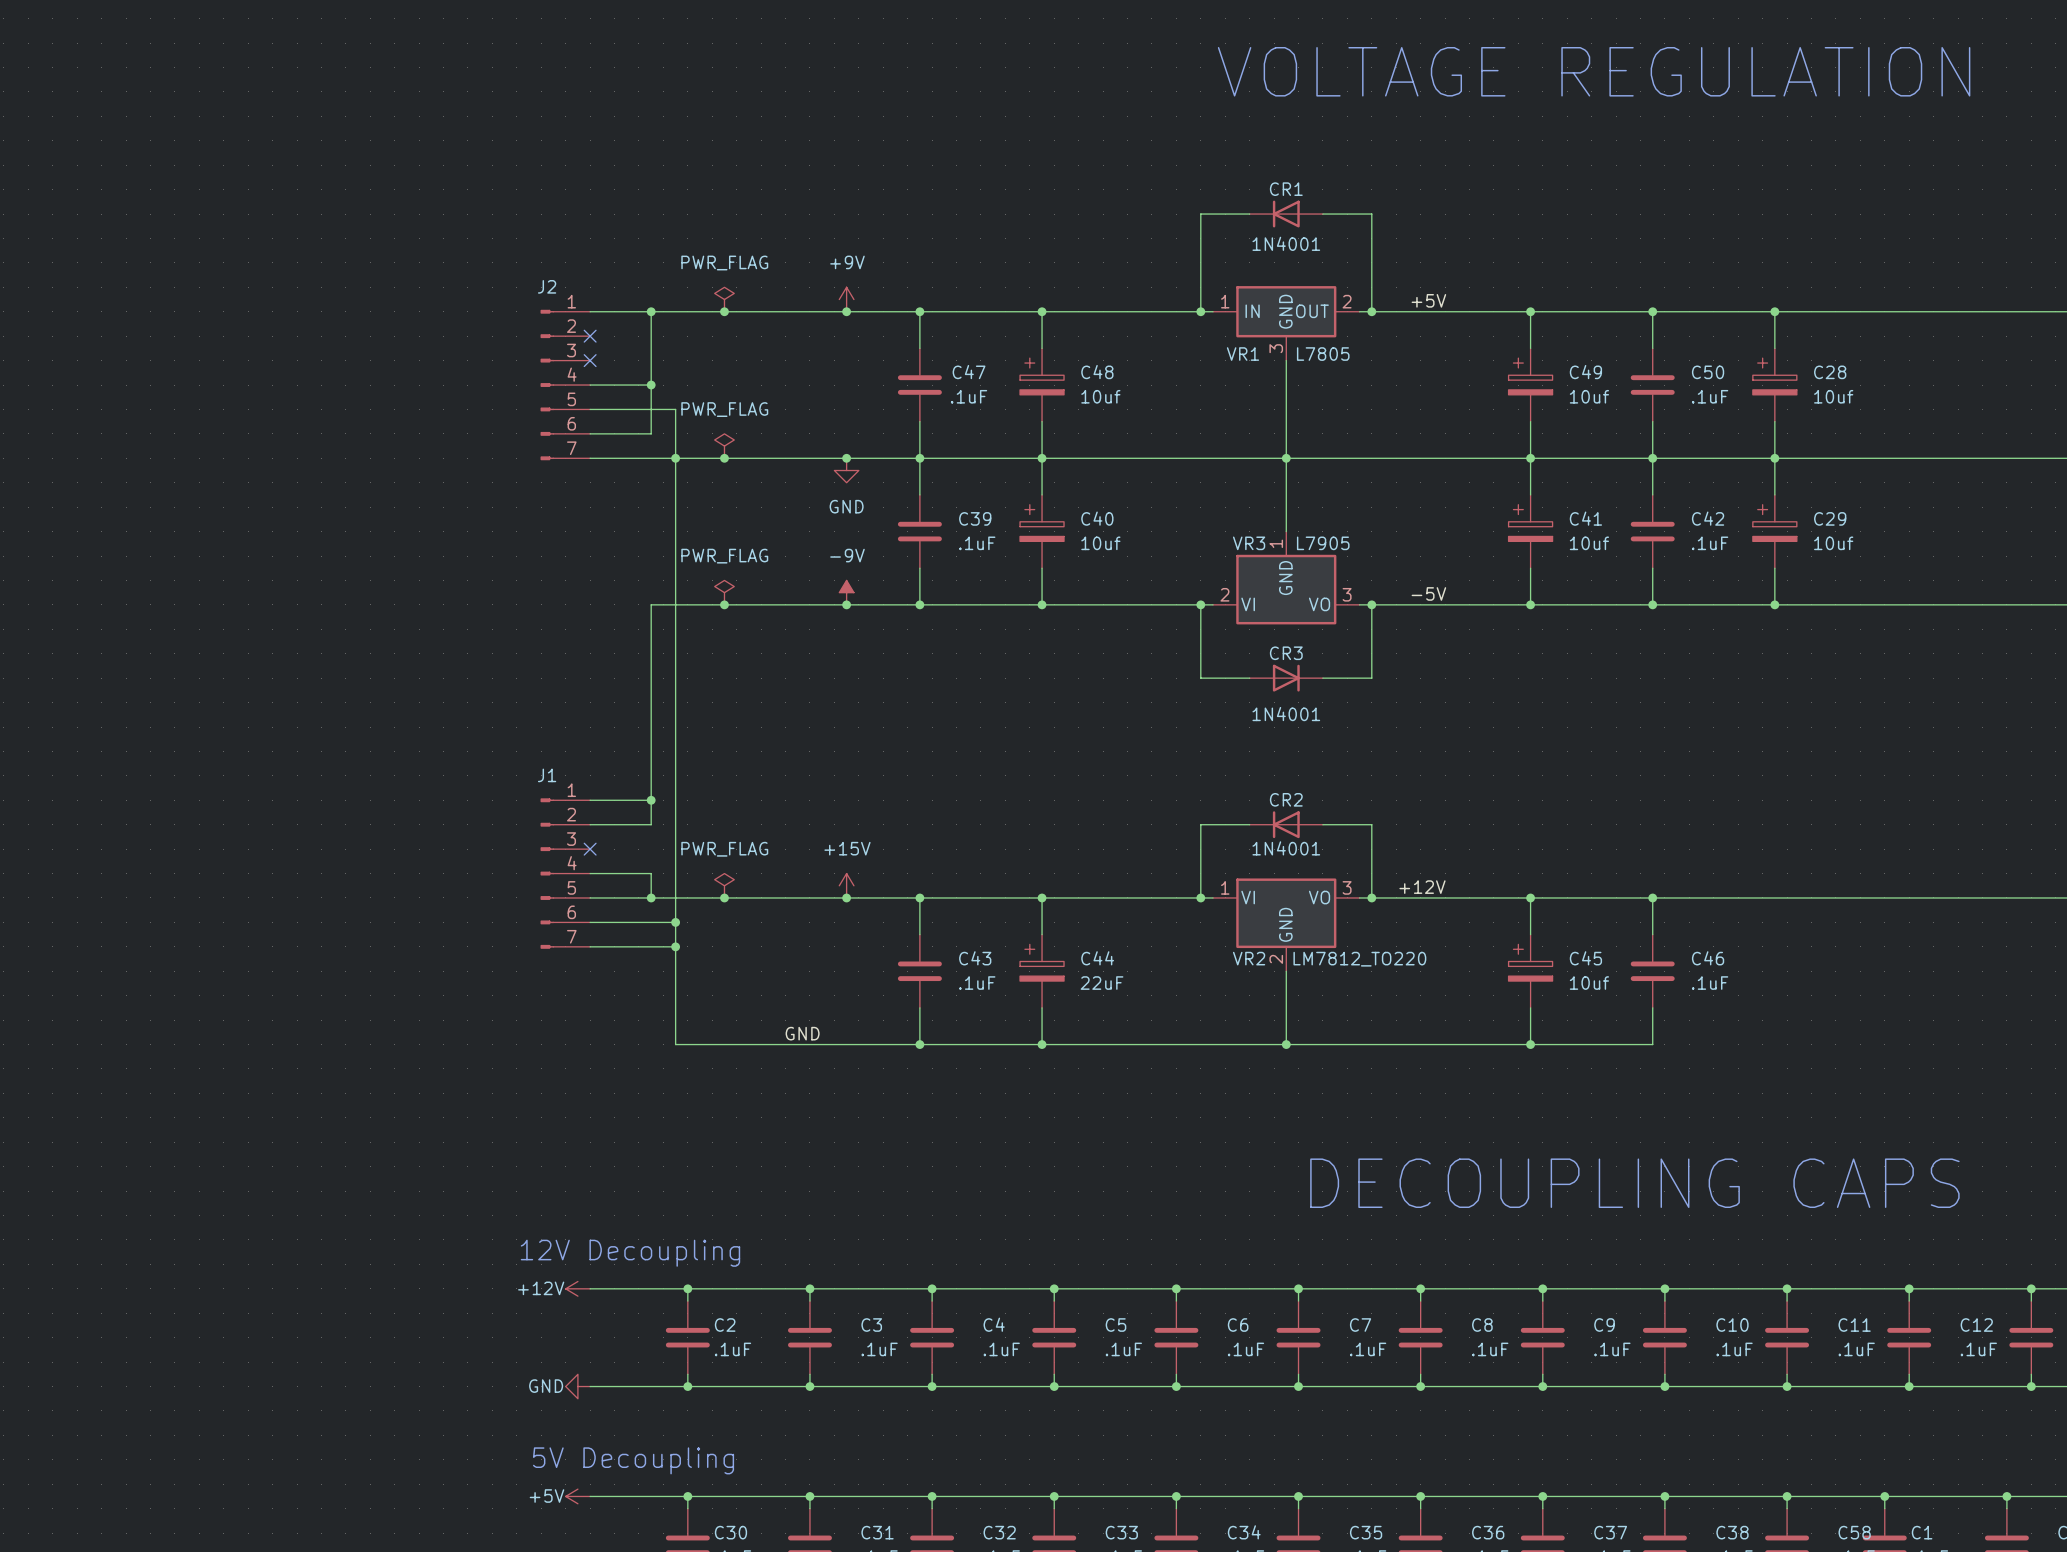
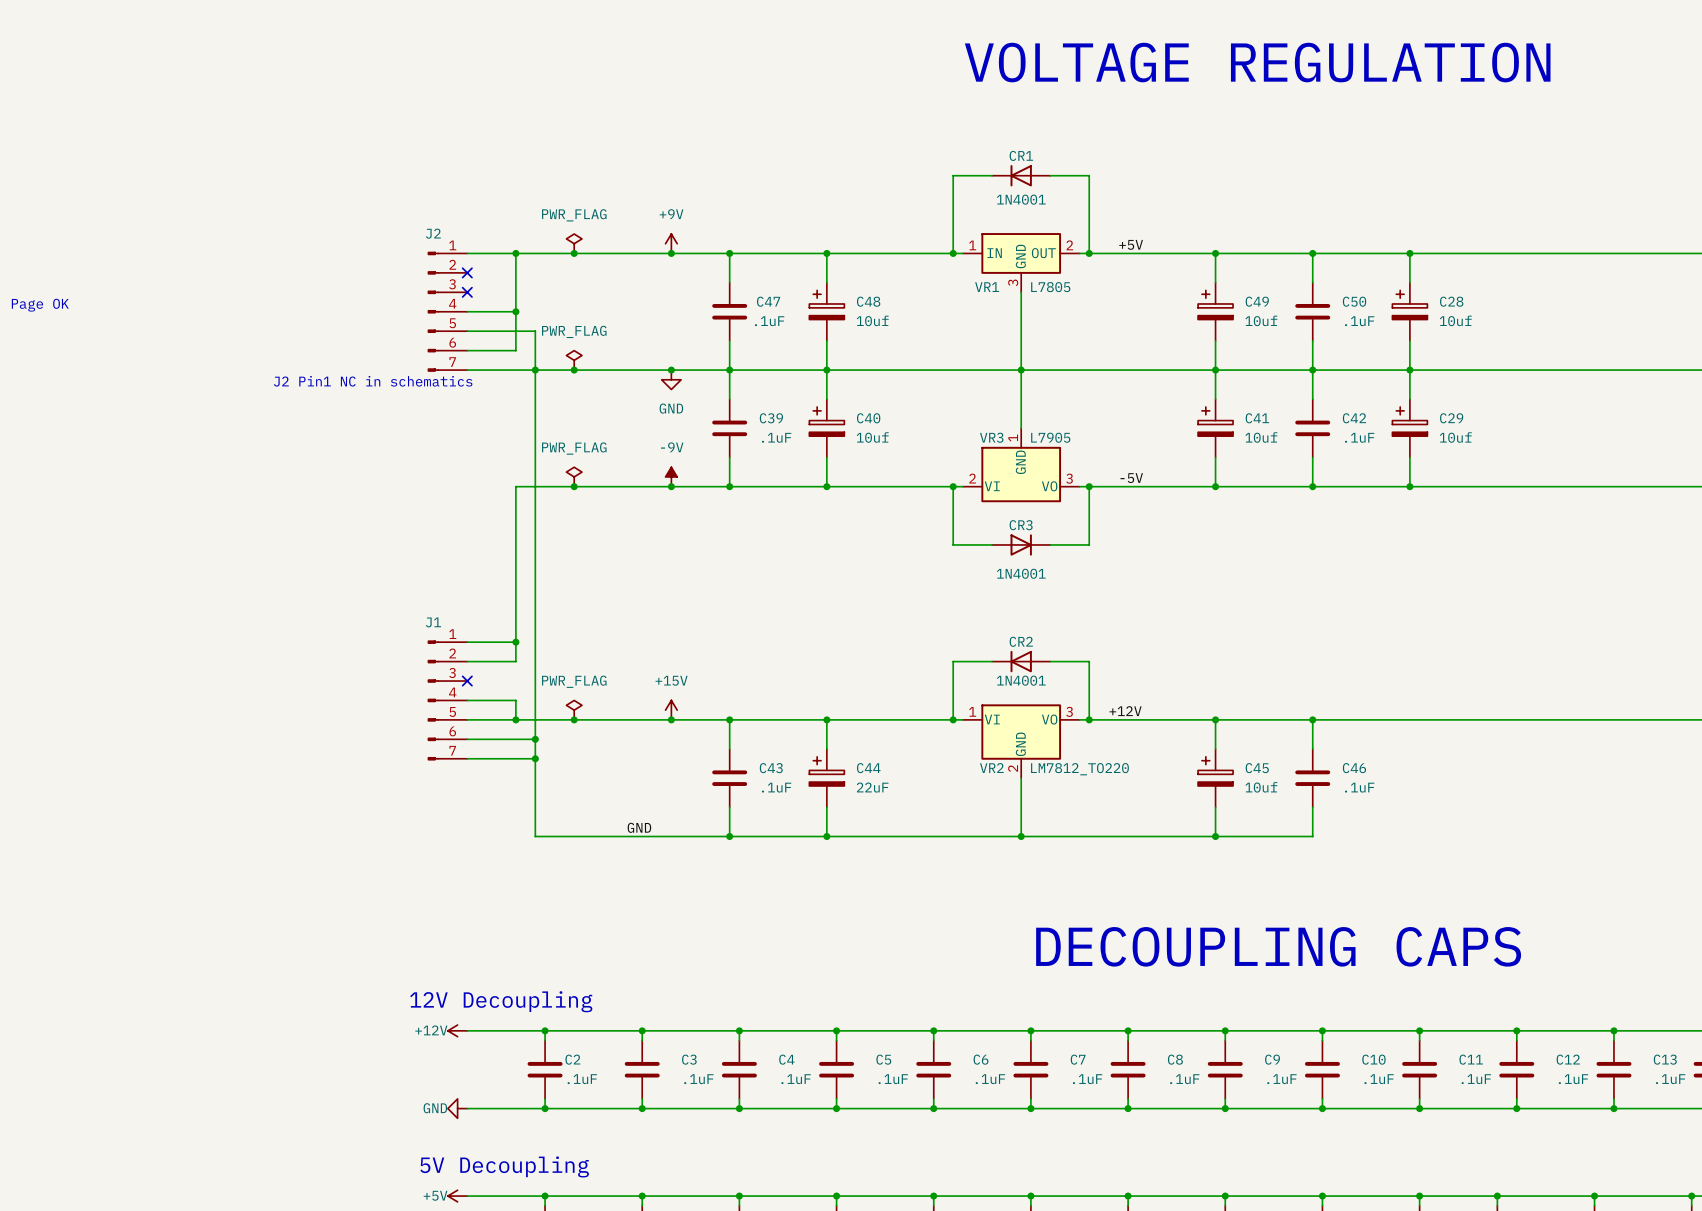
text: none -> Page OK (40, 305)
text: none -> J2 Pin1 NC in schematics (373, 381)

